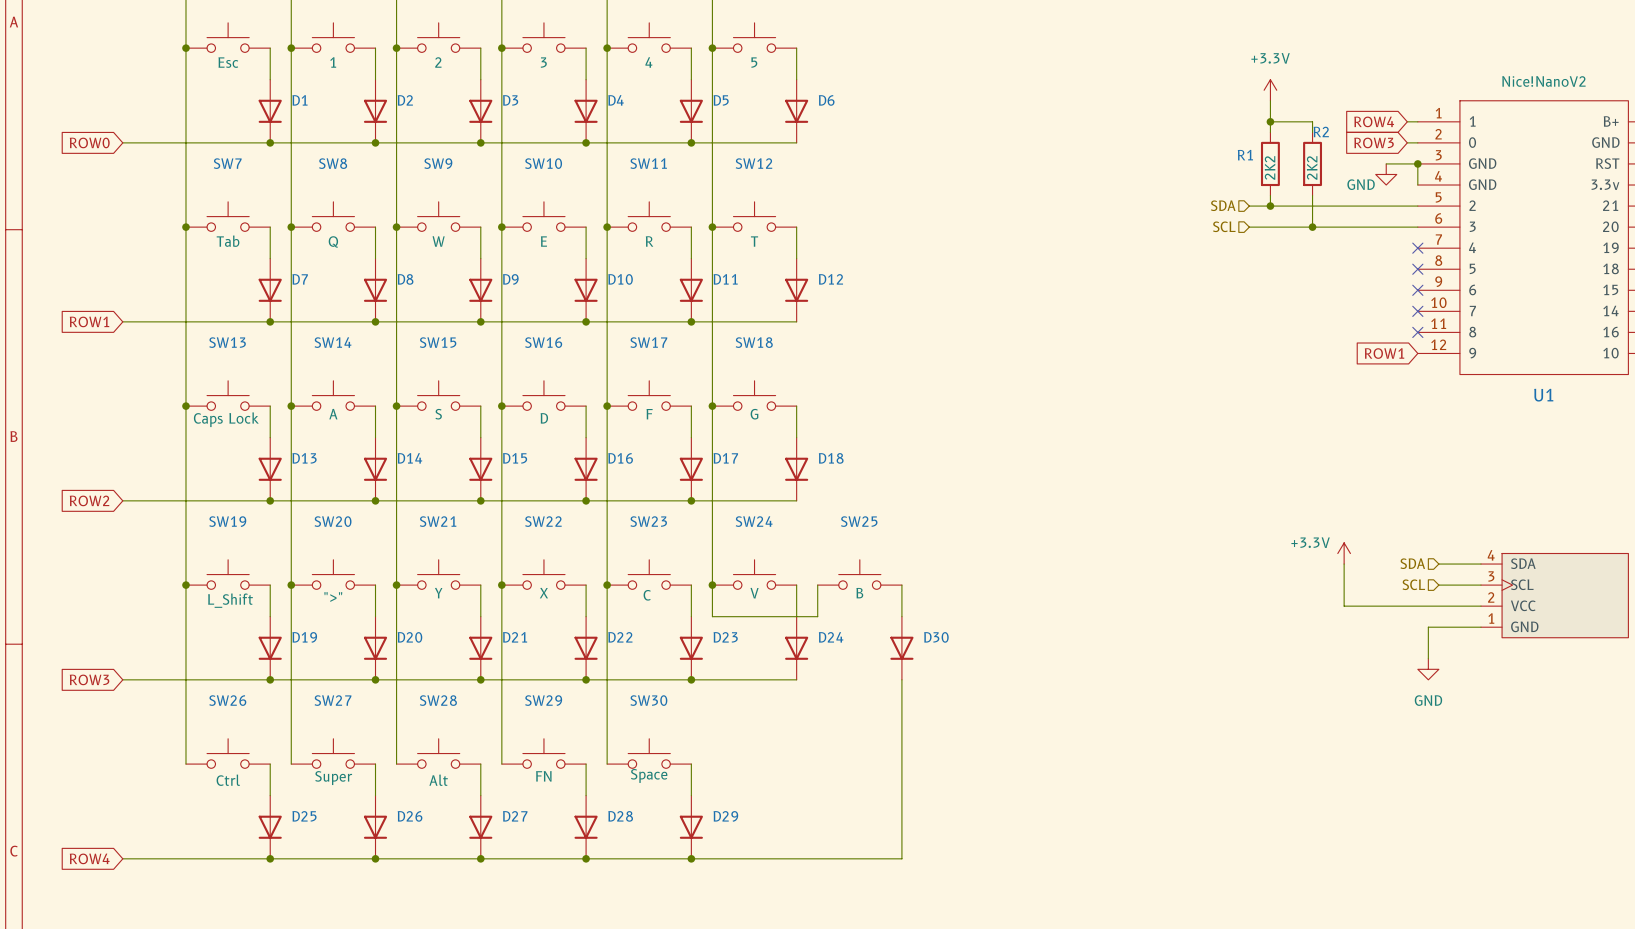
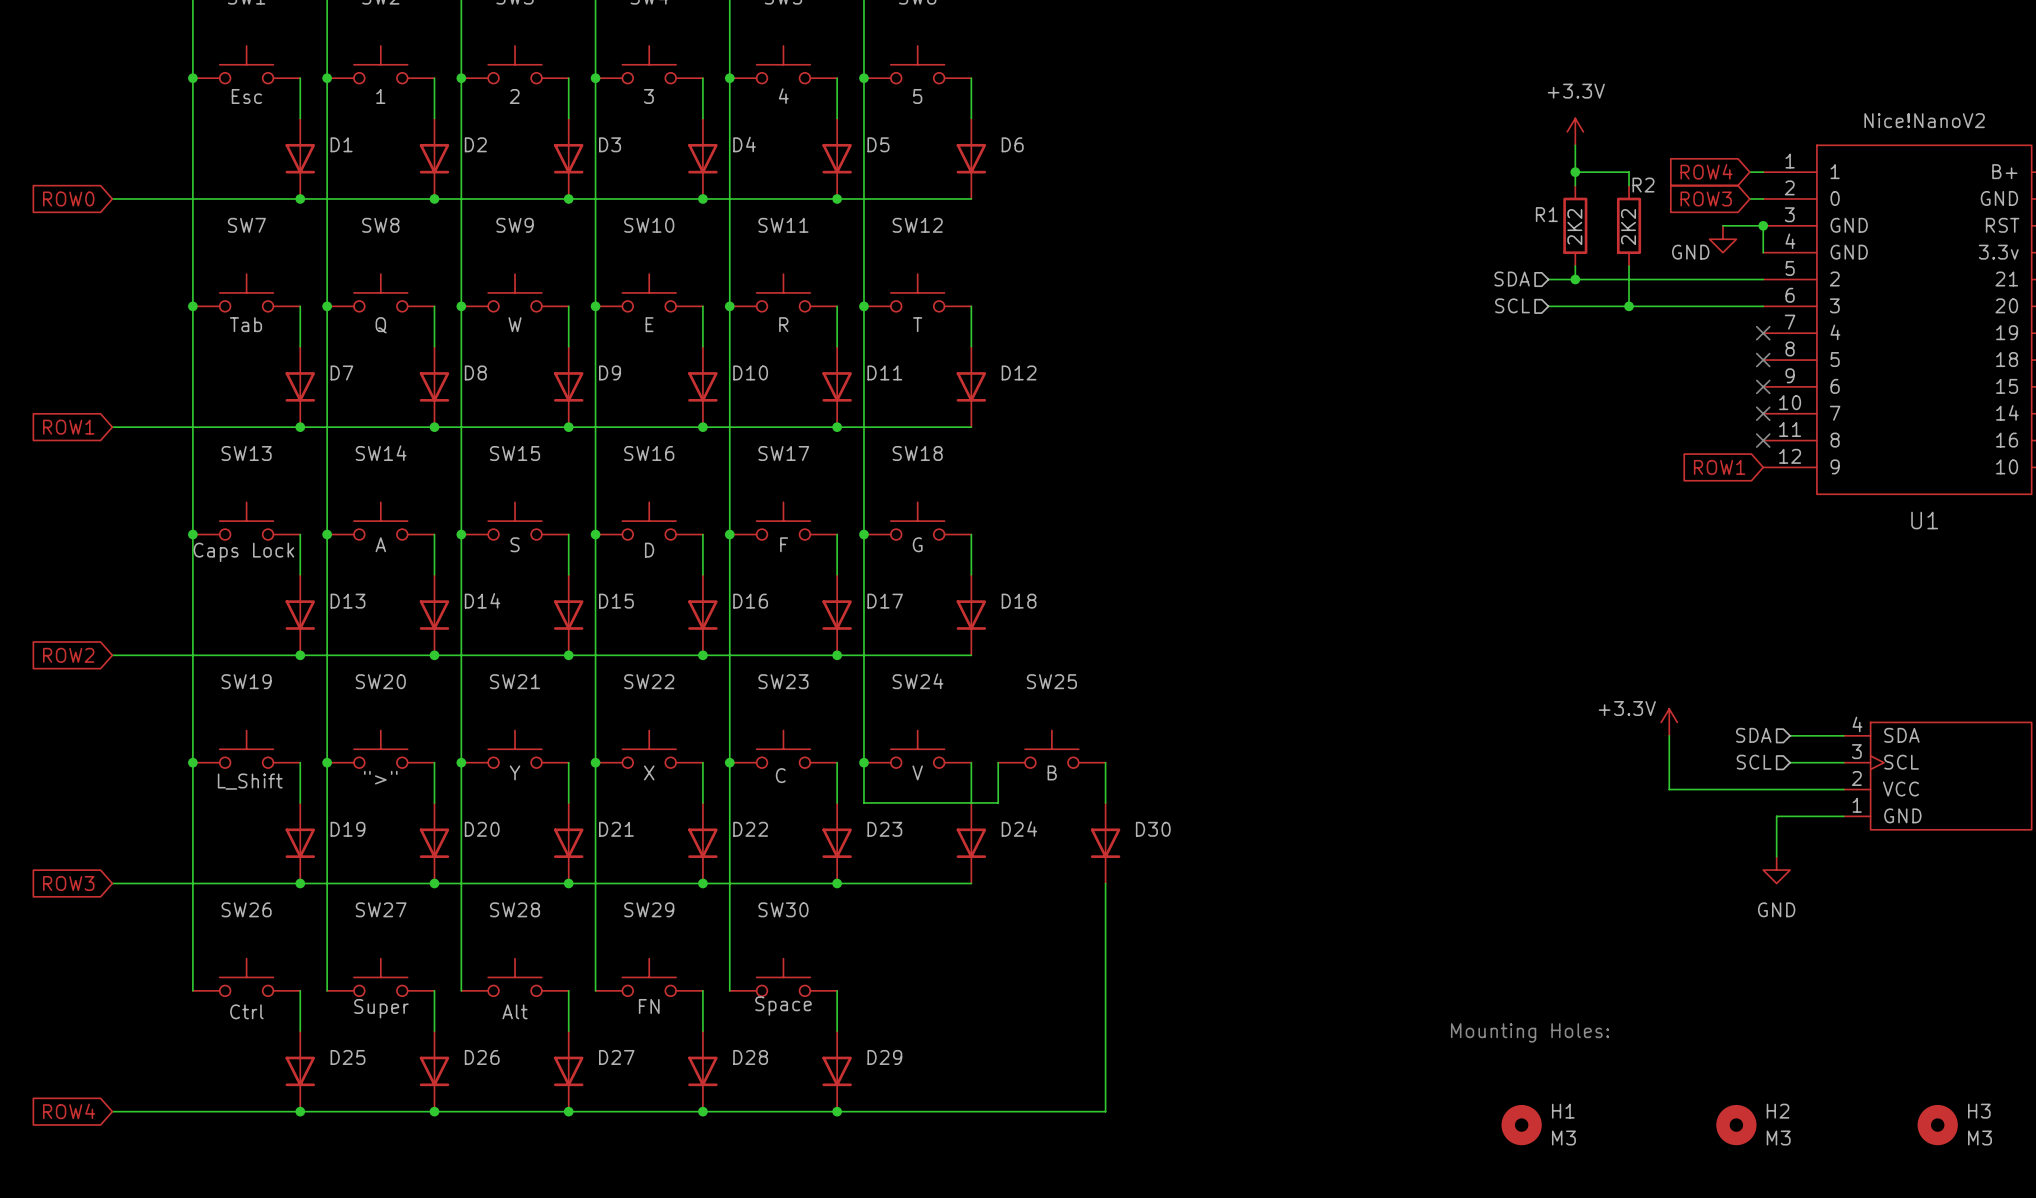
text: none -> Mounting Holes: (1530, 1032)
H1: none -> M3 (1521, 1125)
H2: none -> M3 (1736, 1125)
H3: none -> M3 (1937, 1125)

